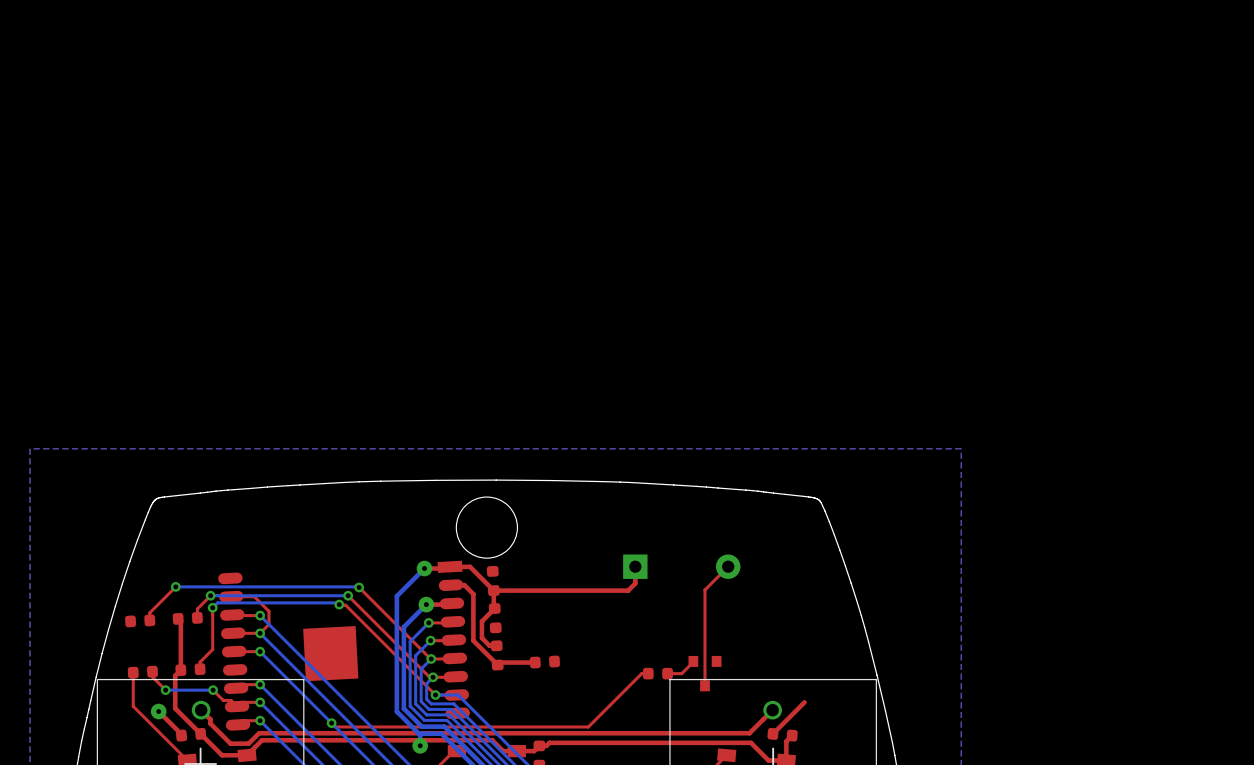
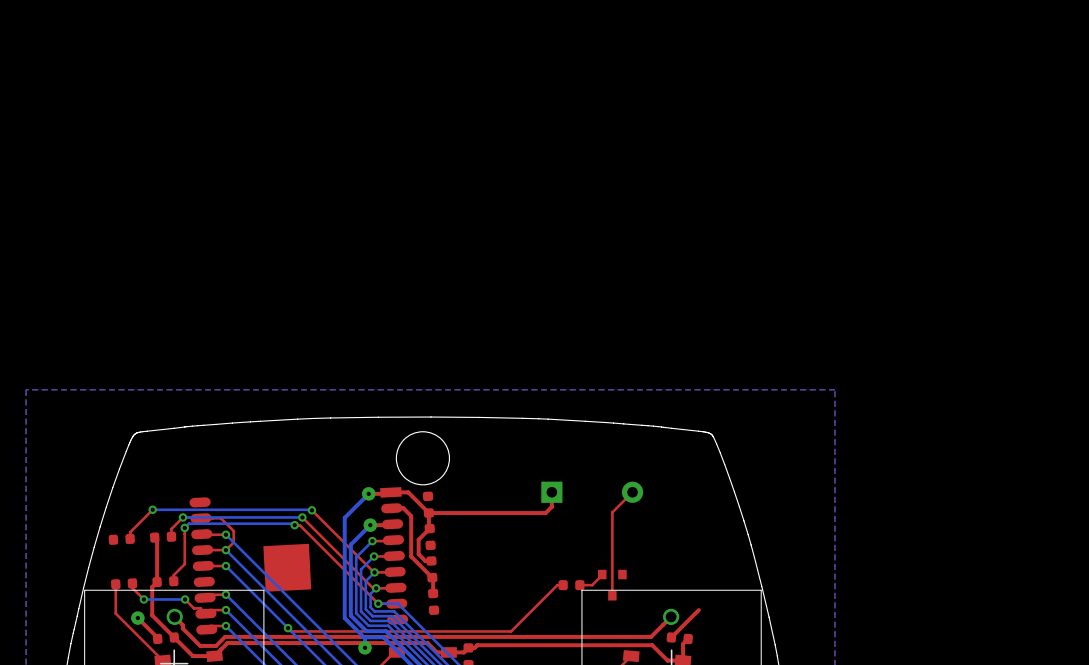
top track: (535, 662) (500, 662) (497, 665) -> none
part rotation: 0° (544, 662) -> 90° clockwise (433, 601)
part position: (544, 662) -> (433, 601)
top track: none -> (433, 578) (433, 593)

